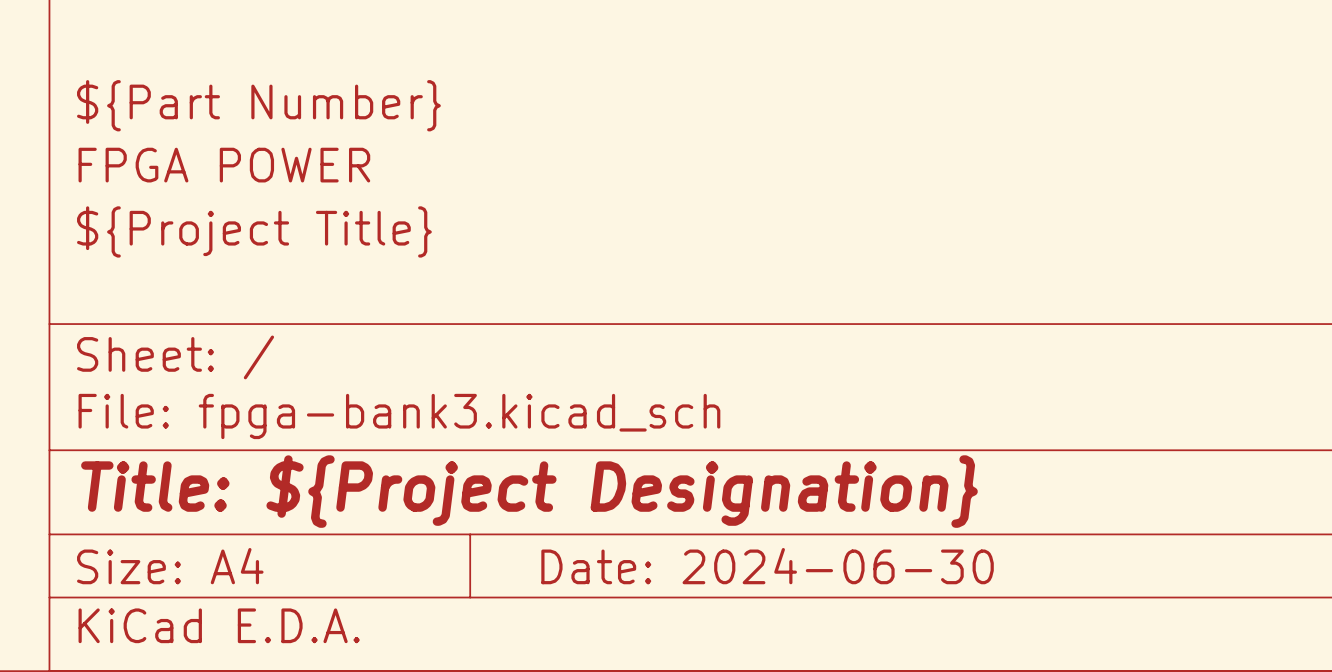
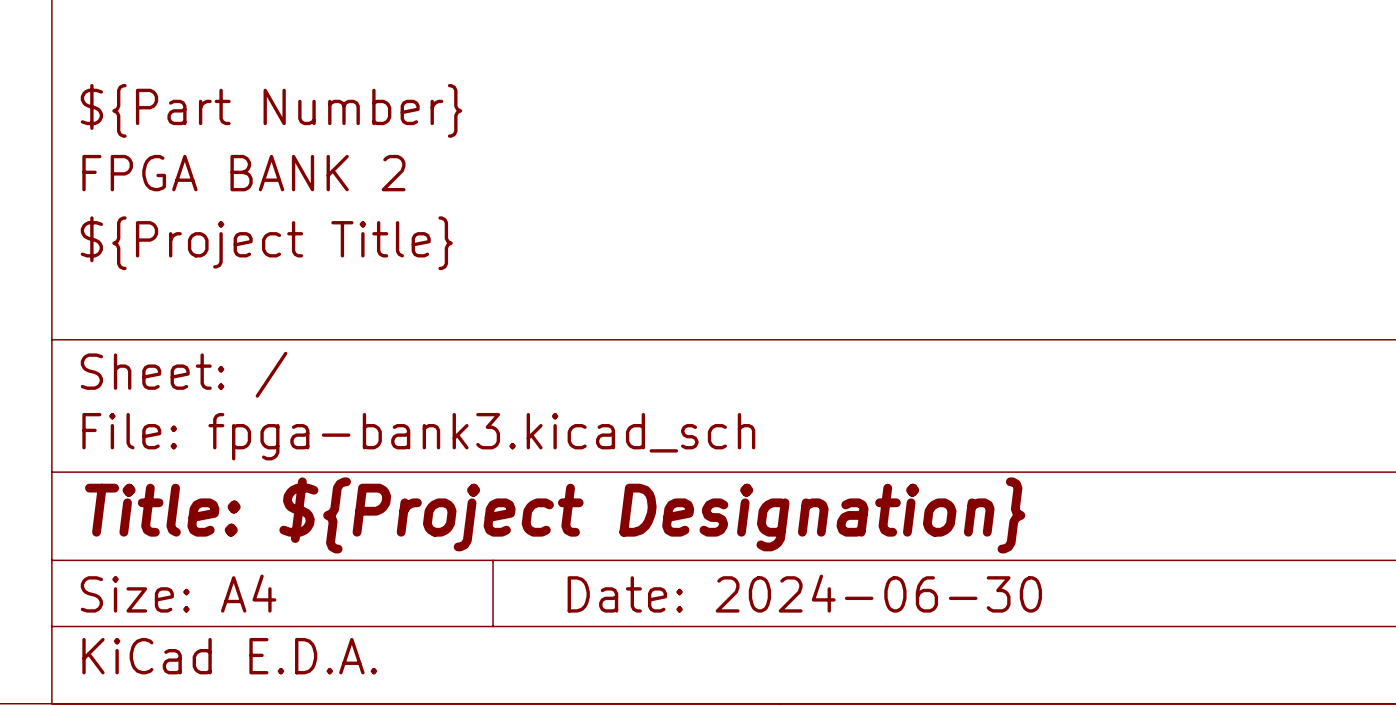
title block: FPGA POWER (224, 165) -> FPGA BANK 2 (243, 173)

